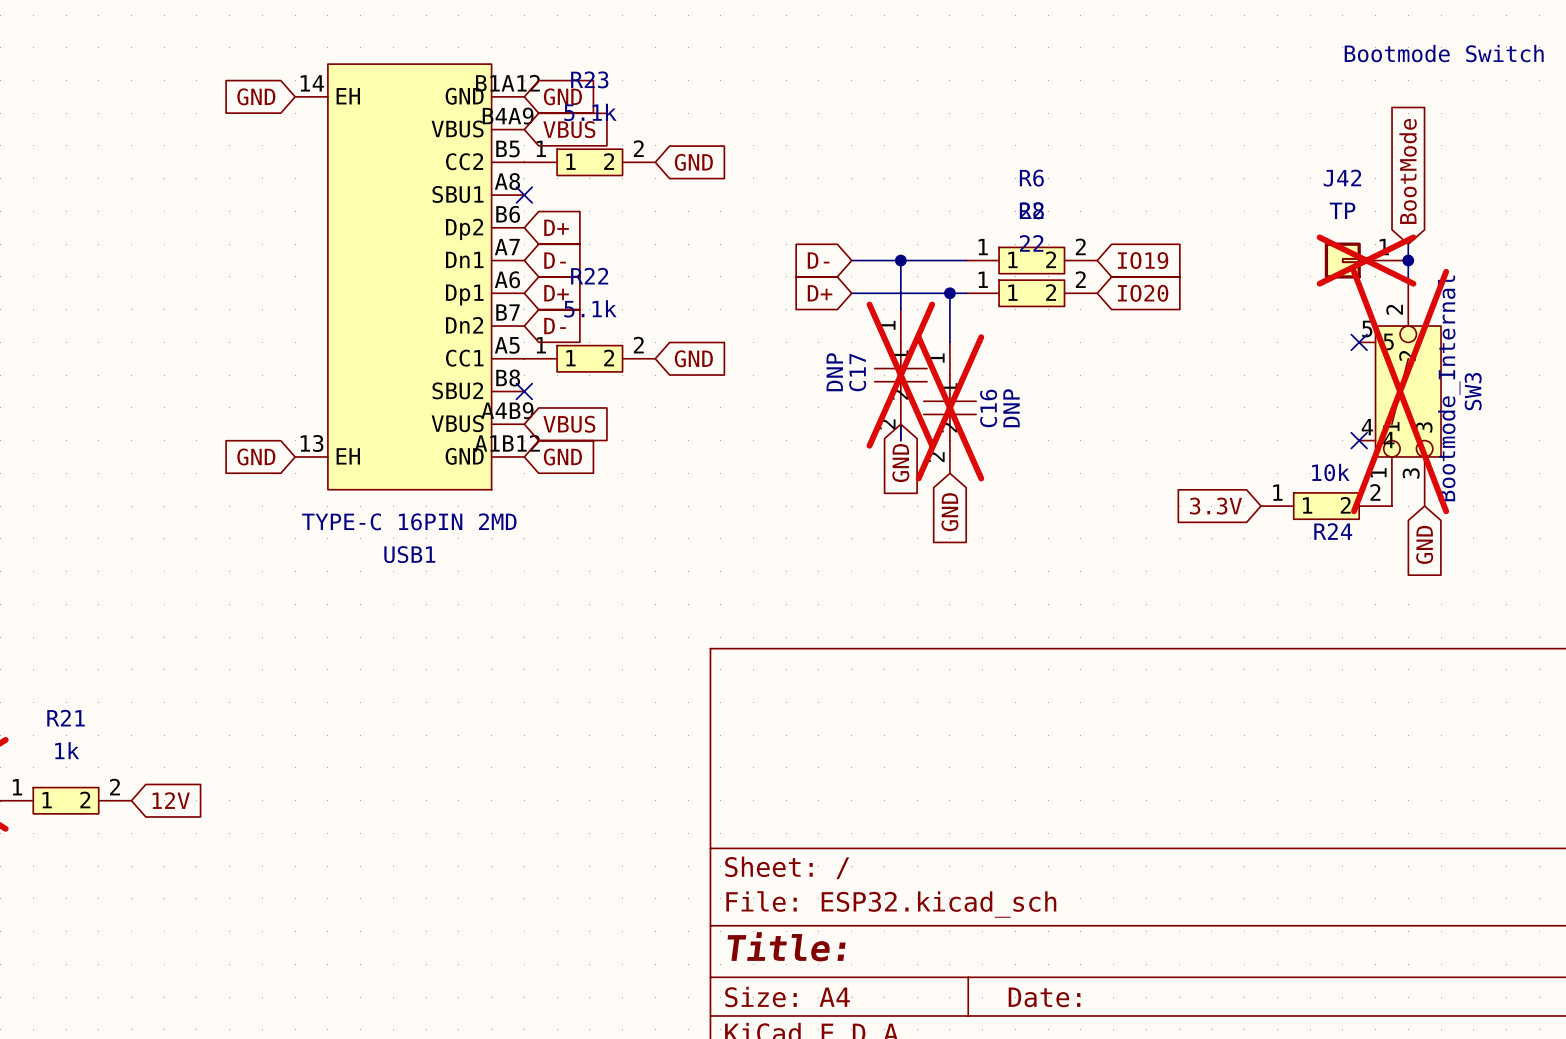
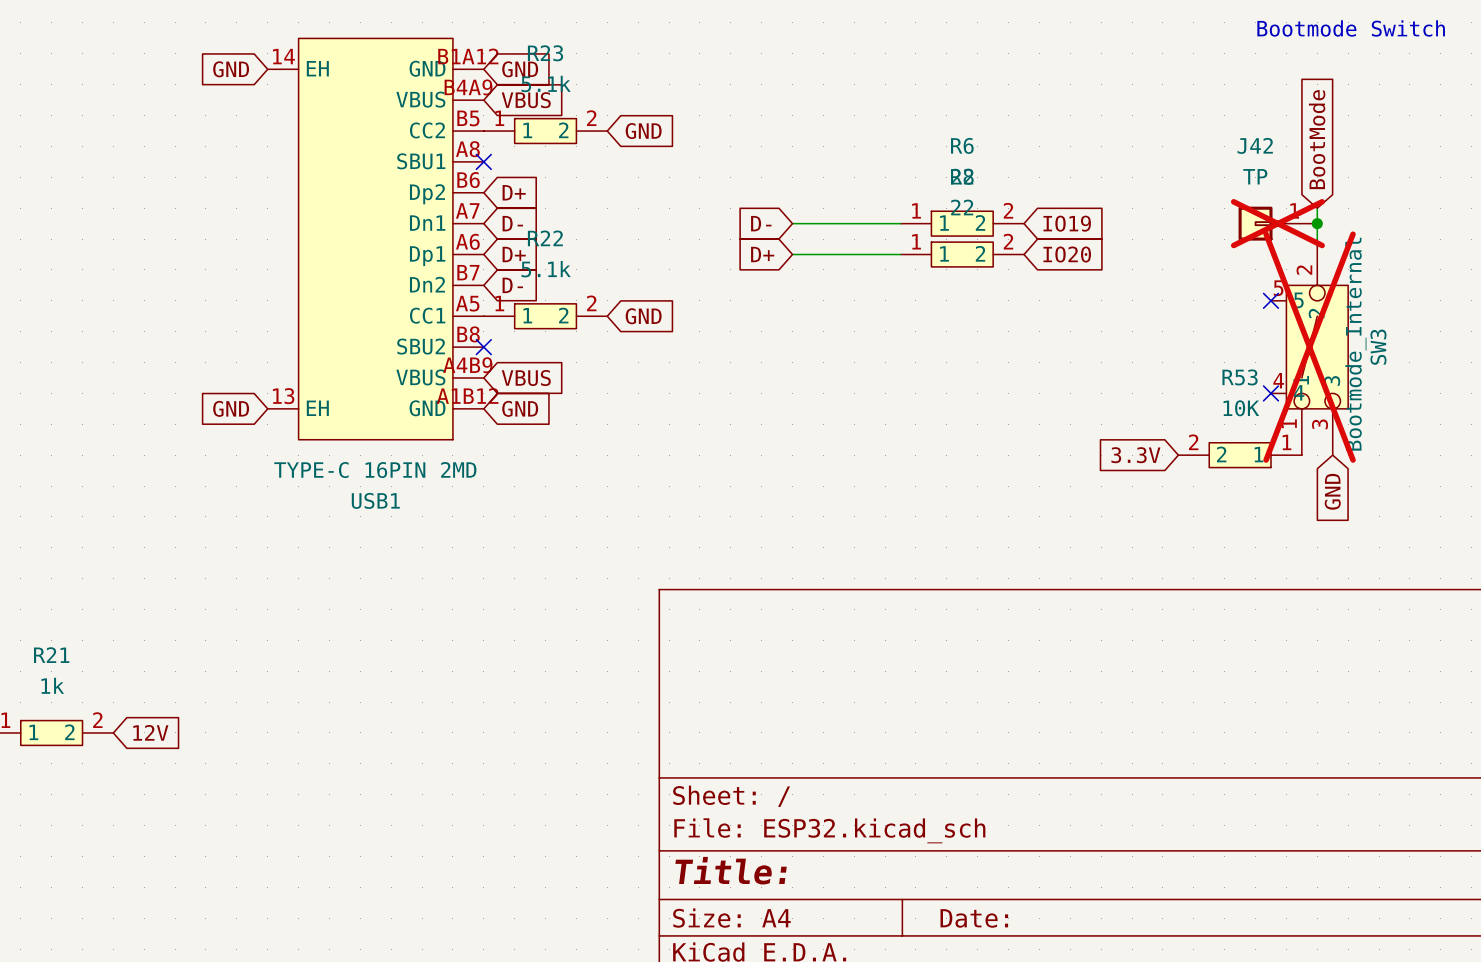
wire: (900, 260) (900, 309) -> none
junction: (900, 260) -> none
wire: (949, 293) (949, 342) -> none
junction: (949, 293) -> none
C17: DNP (900, 375) -> none
C16: DNP (949, 407) -> none
wire: (900, 424) (900, 440) -> none
global label: GND (900, 463) -> none
R24 value: 10k (1330, 472) -> 10K (1241, 408)
R24 rotation: 0° (1326, 506) -> 180° (1240, 455)
global label: GND (949, 512) -> none
R24 name: R24 (1333, 531) -> R53 (1240, 377)

